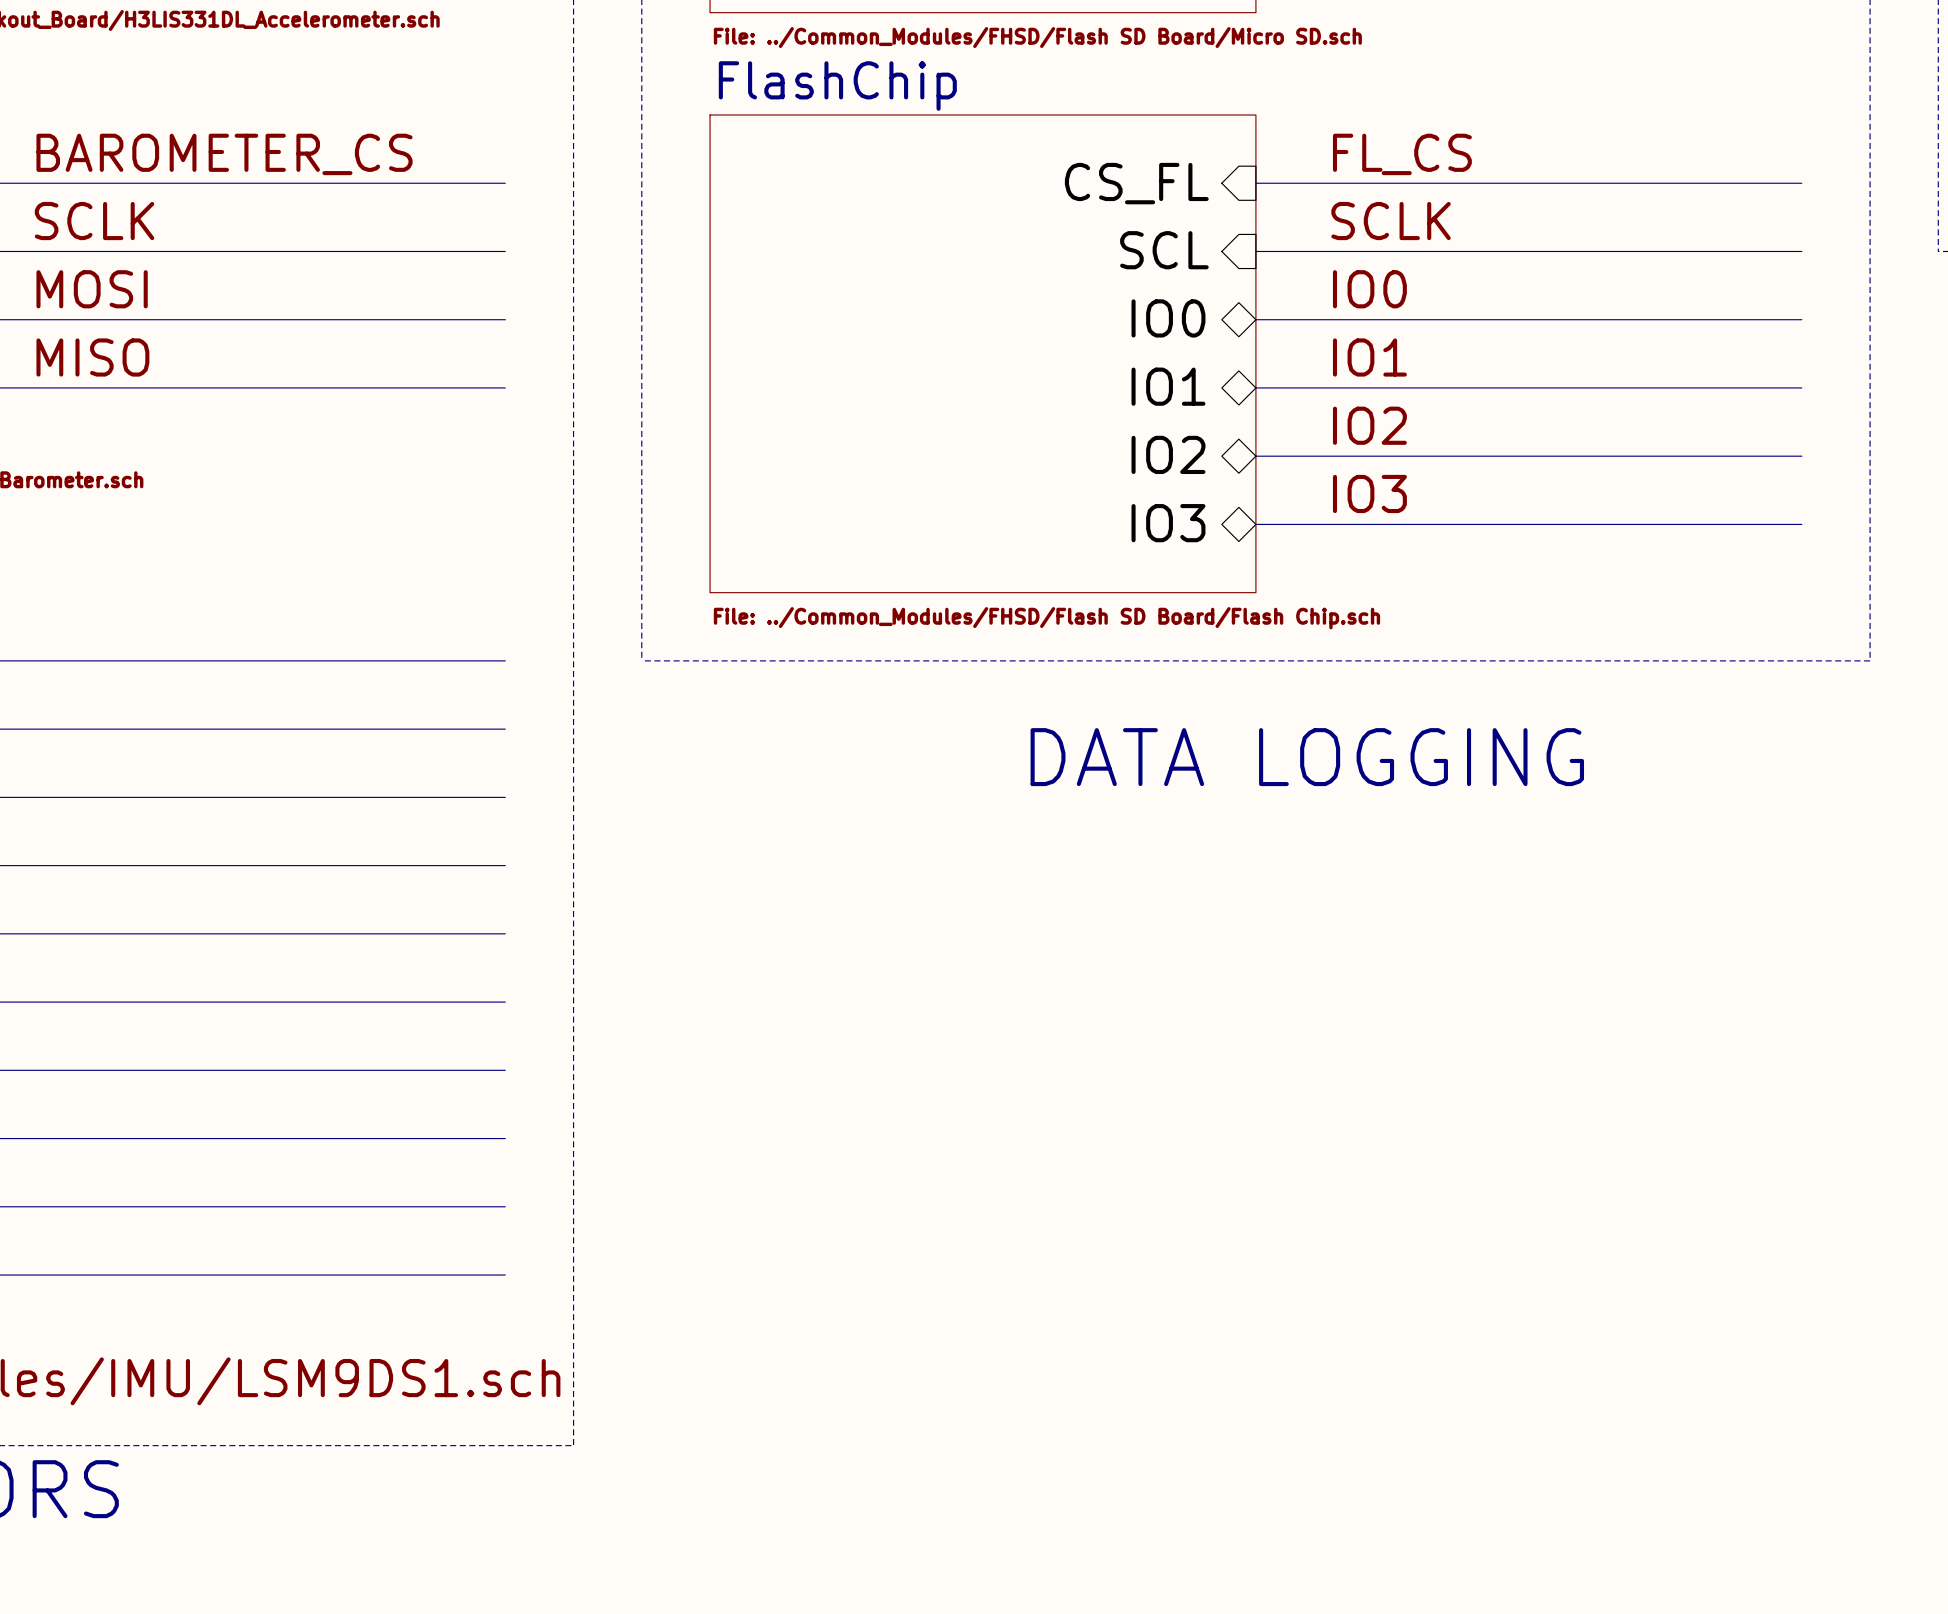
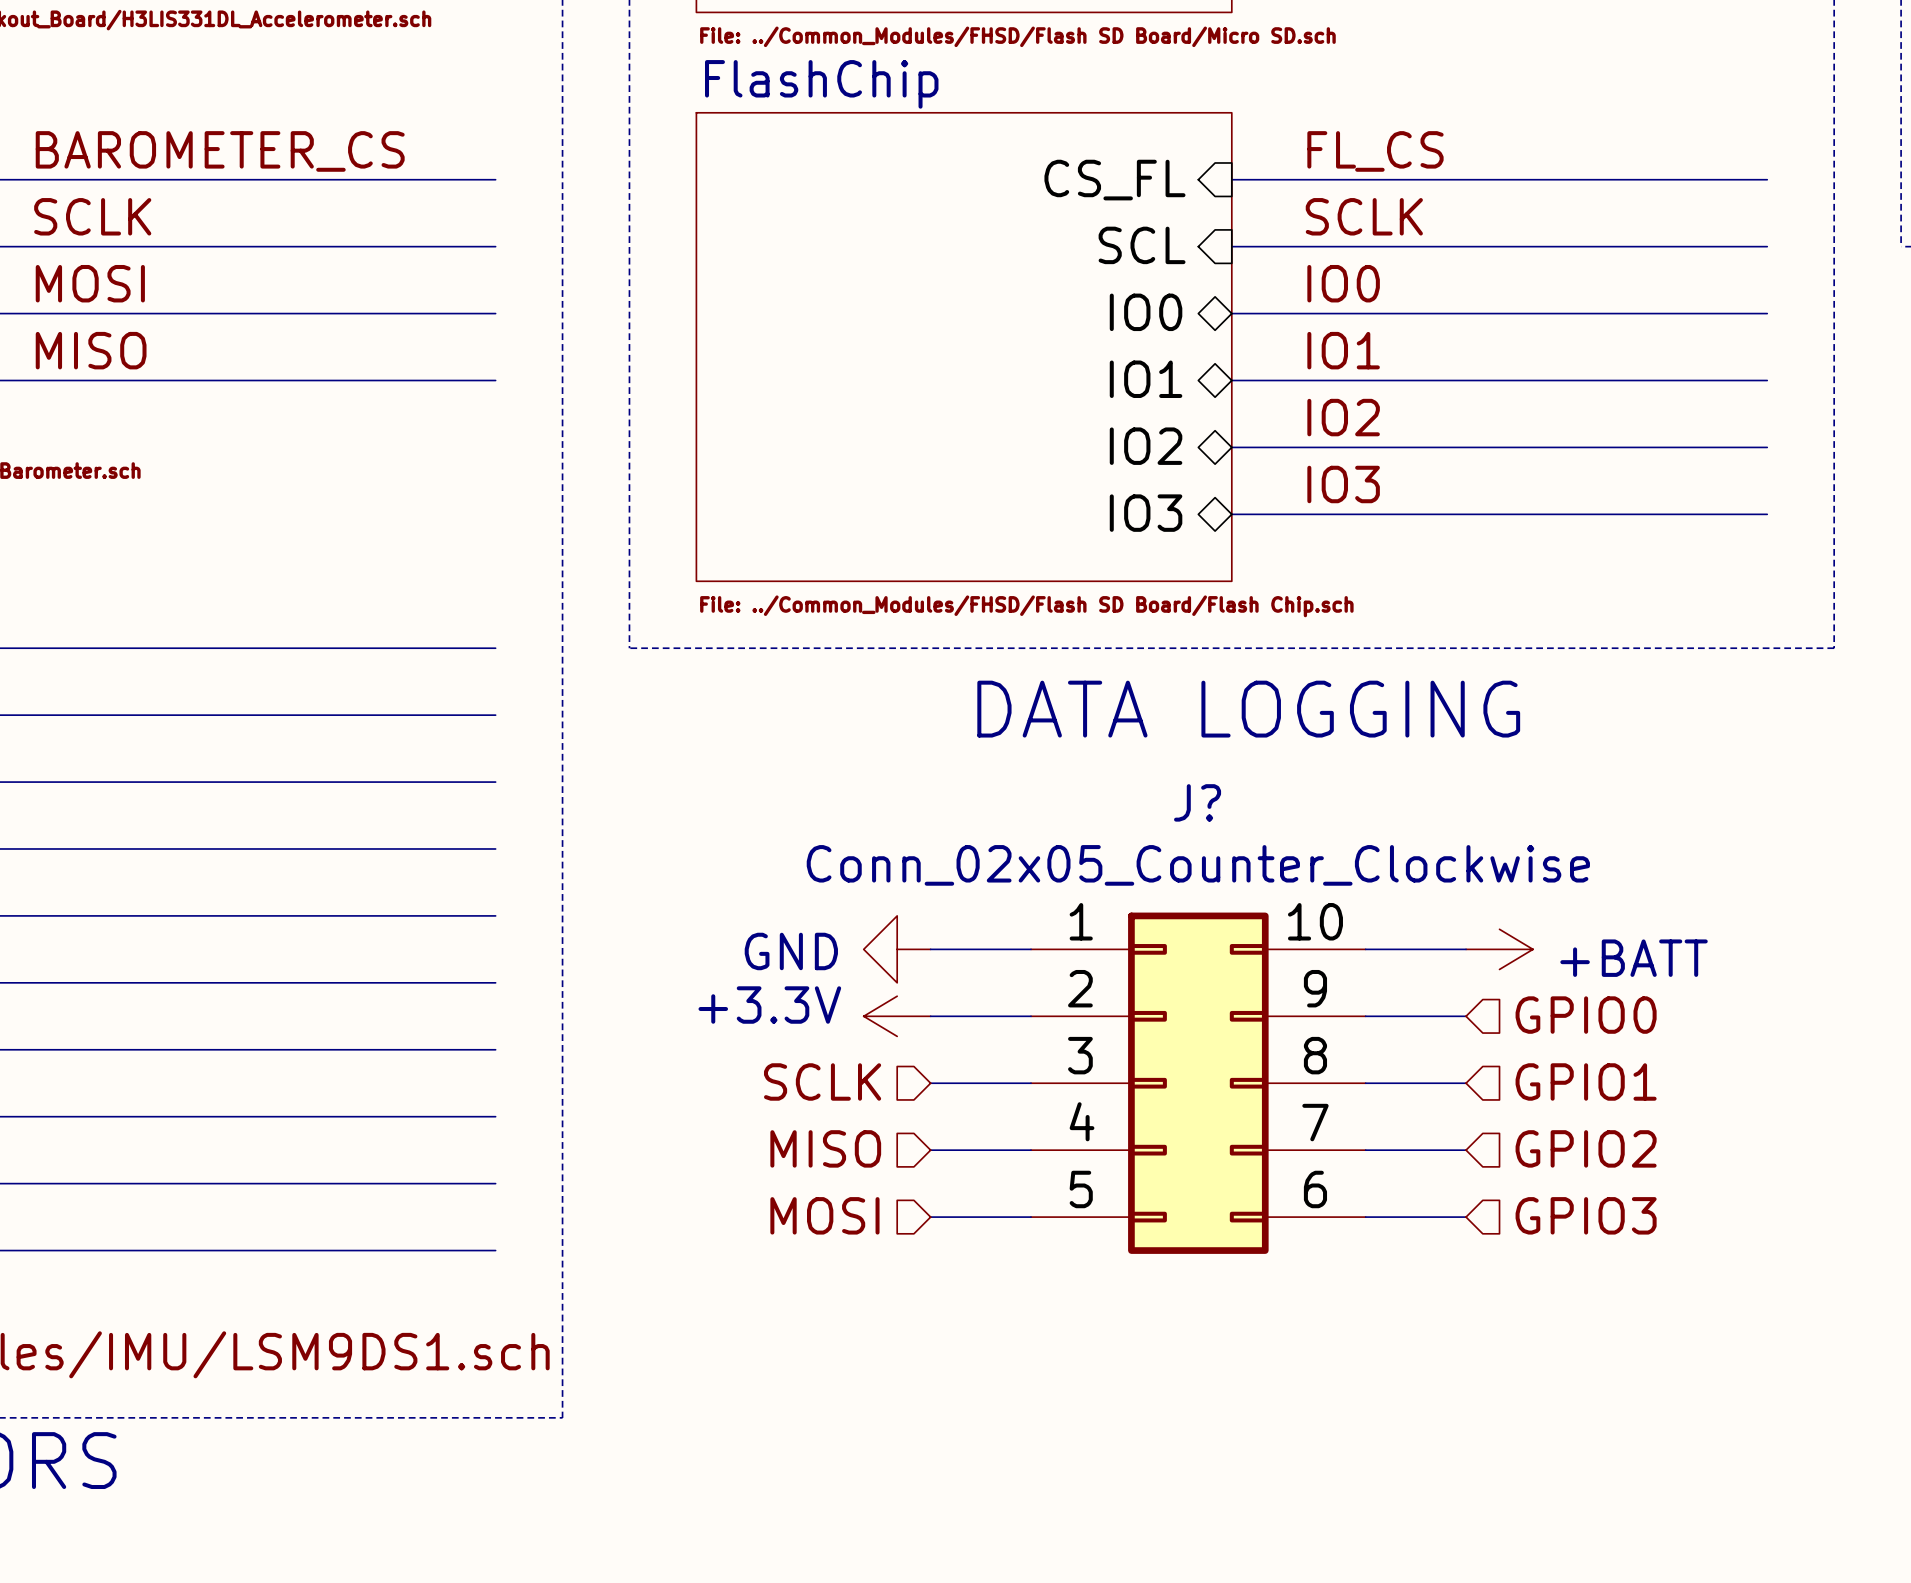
text position: DATA LOGGING (1307, 757) -> DATA LOGGING (1248, 709)
power symbol: none -> GND (897, 949)
wire: none -> (930, 949) (1031, 949)
wire: none -> (1365, 949) (1466, 949)
power symbol: none -> +BATT (1499, 949)
hierarchical label: none -> GPIO0 (1586, 1015)
power symbol: none -> +3.3V (897, 1016)
wire: none -> (930, 1016) (1031, 1016)
wire: none -> (1365, 1016) (1466, 1016)
hierarchical label: none -> SCLK (822, 1081)
hierarchical label: none -> GPIO1 (1586, 1081)
wire: none -> (930, 1083) (1031, 1083)
J?: none -> Conn_02x05_Counter_Clockwise (1198, 1083)
wire: none -> (1365, 1083) (1466, 1083)
hierarchical label: none -> MISO (825, 1148)
hierarchical label: none -> GPIO2 (1586, 1148)
wire: none -> (930, 1150) (1031, 1150)
wire: none -> (1365, 1150) (1466, 1150)
hierarchical label: none -> MOSI (824, 1215)
hierarchical label: none -> GPIO3 (1586, 1215)
wire: none -> (930, 1217) (1031, 1217)
wire: none -> (1365, 1217) (1466, 1217)

